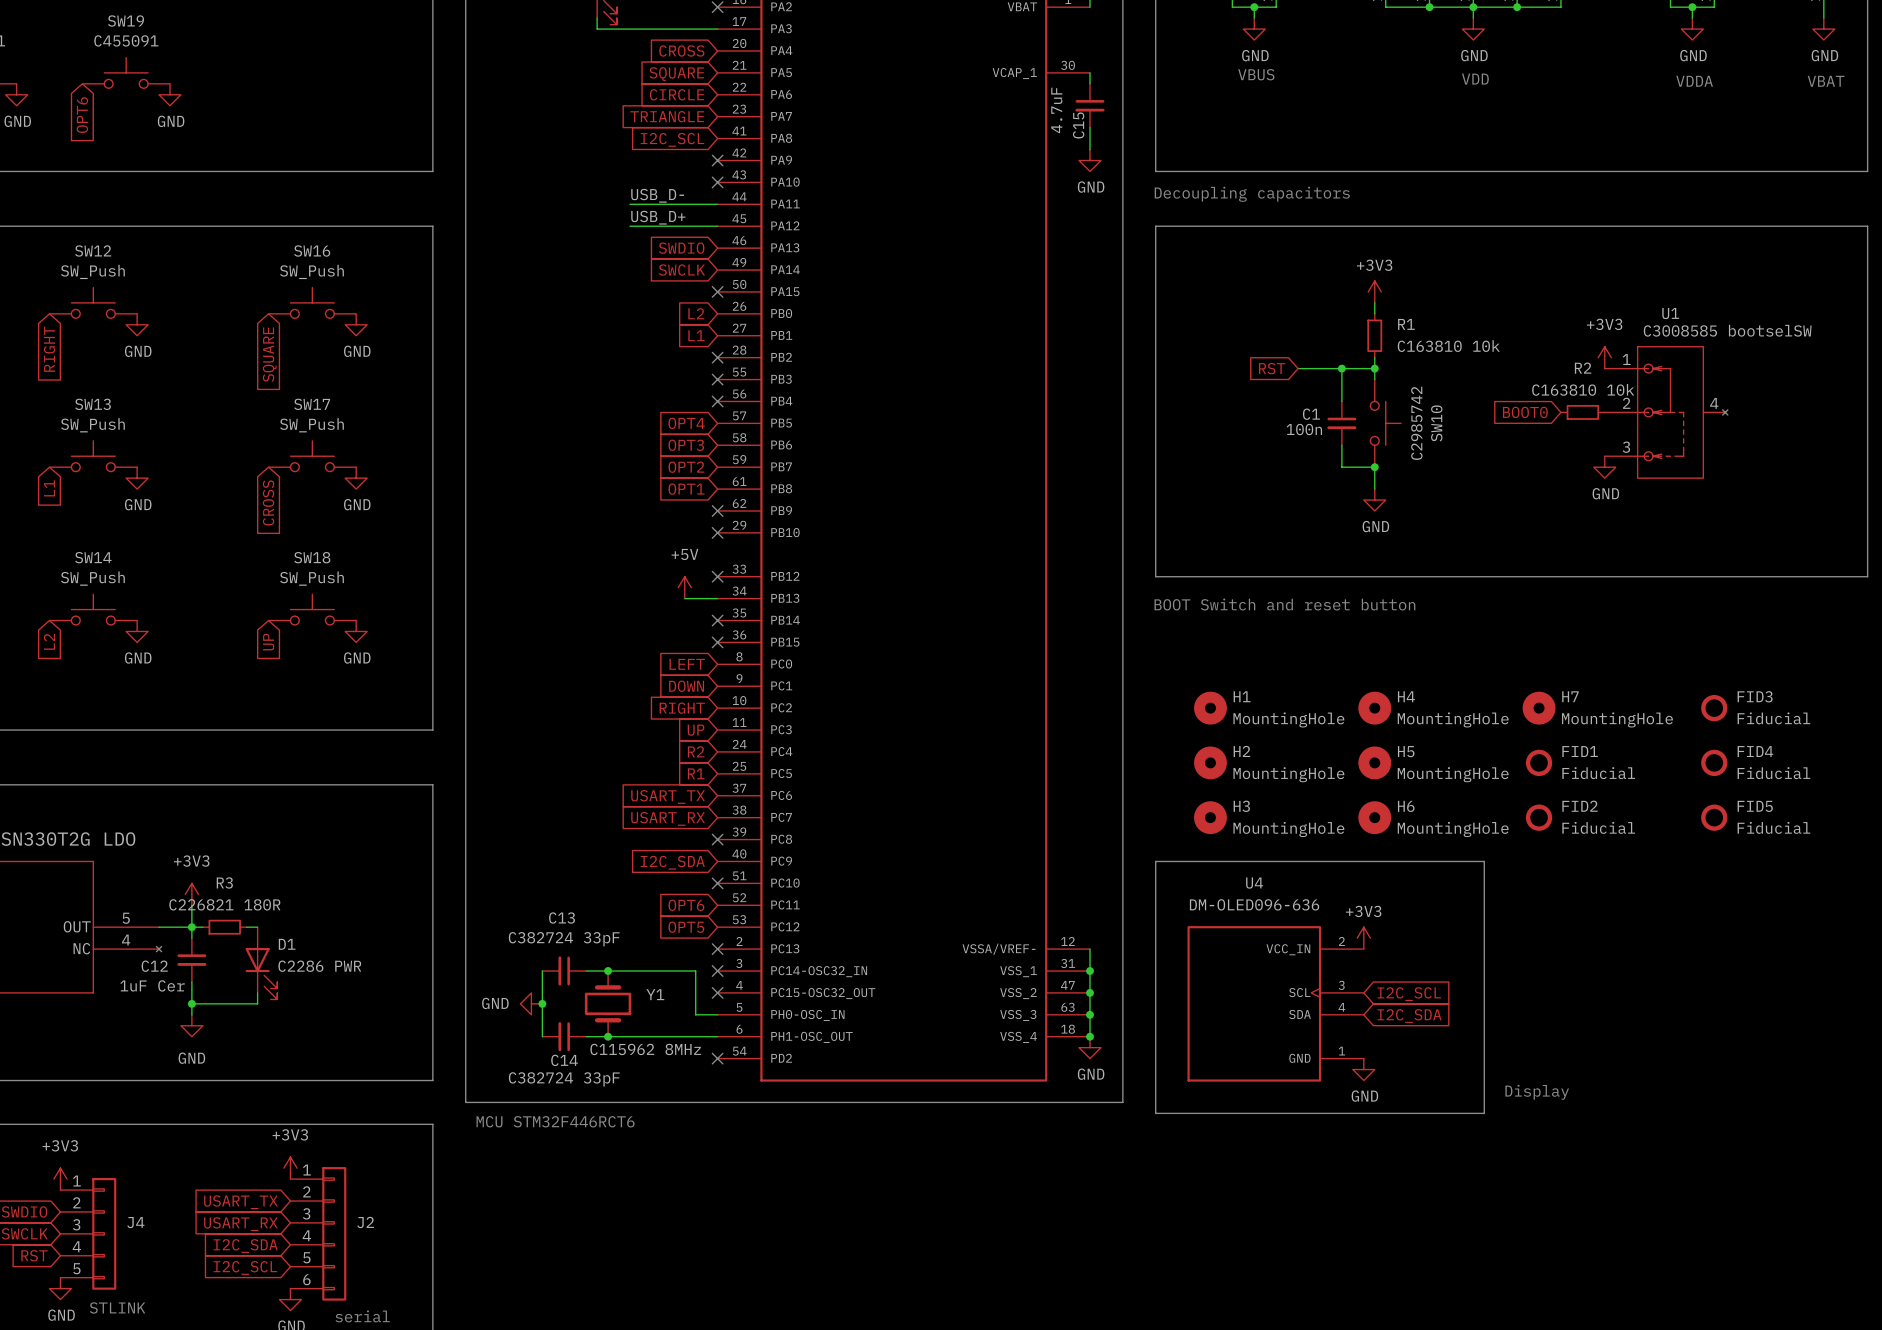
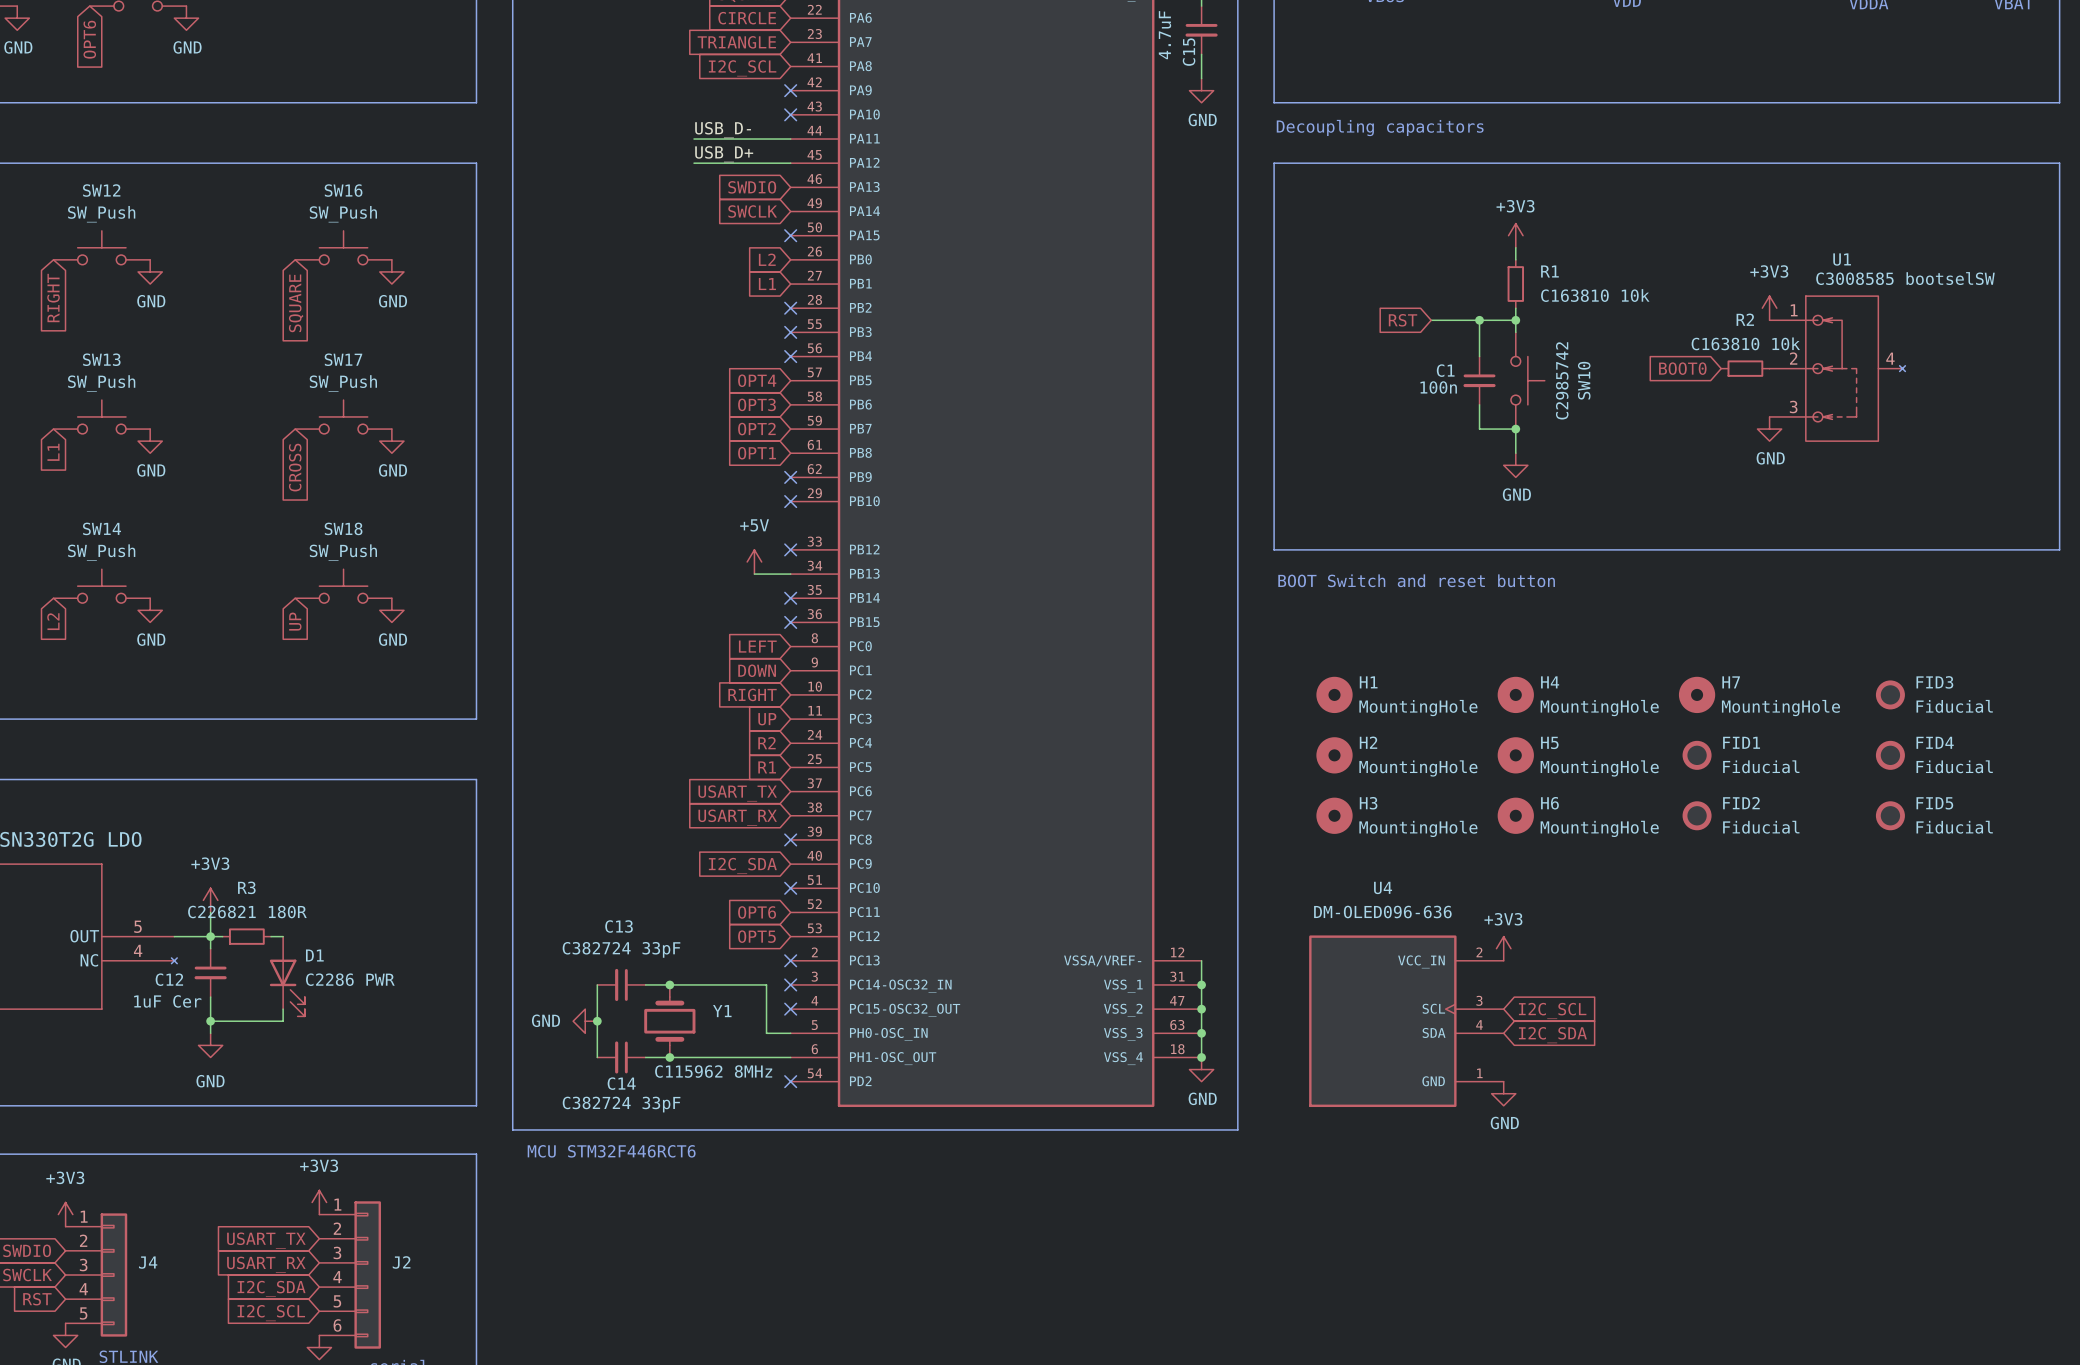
line: (1155, 861) (1484, 861) (1484, 1113) (1155, 1113) (1155, 861) -> none
text: Display (1537, 1092) -> none

